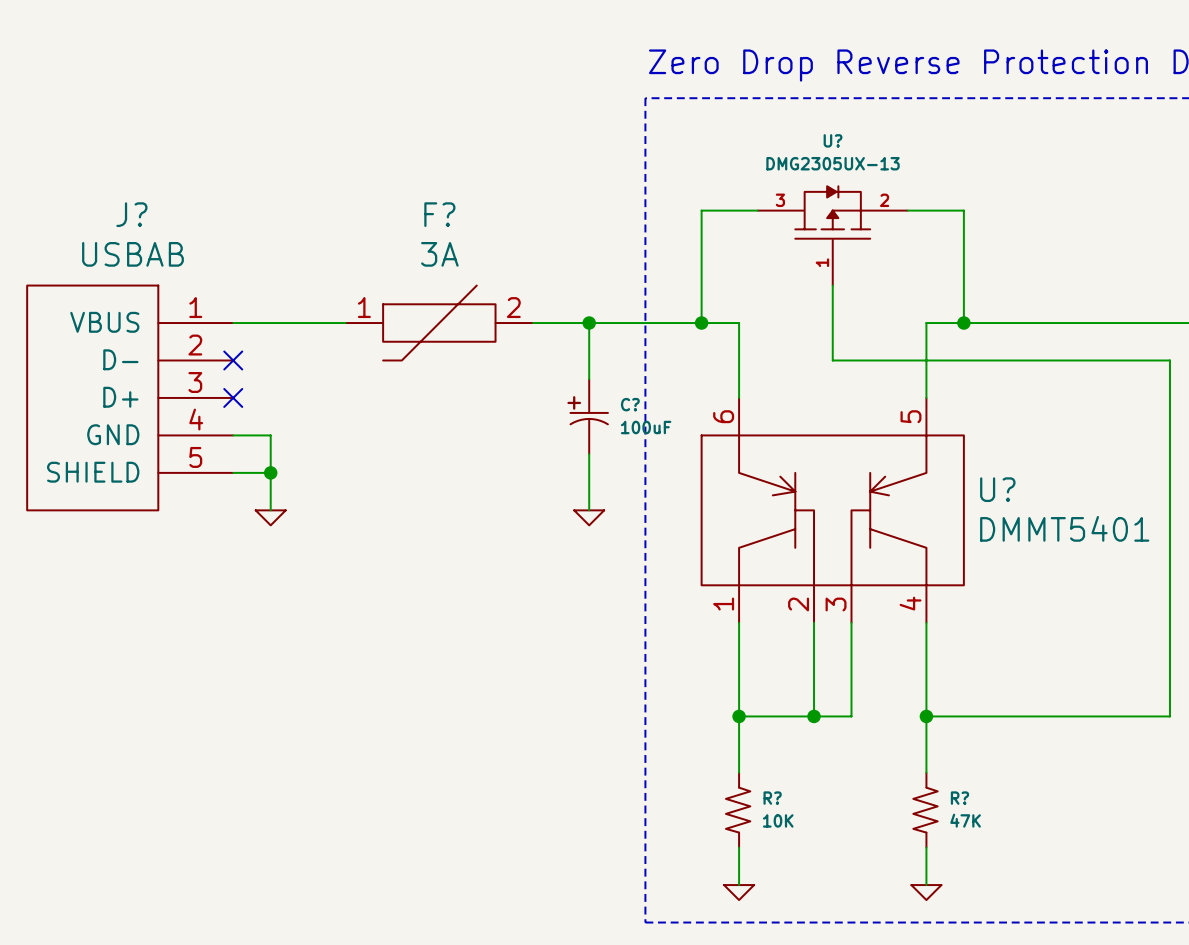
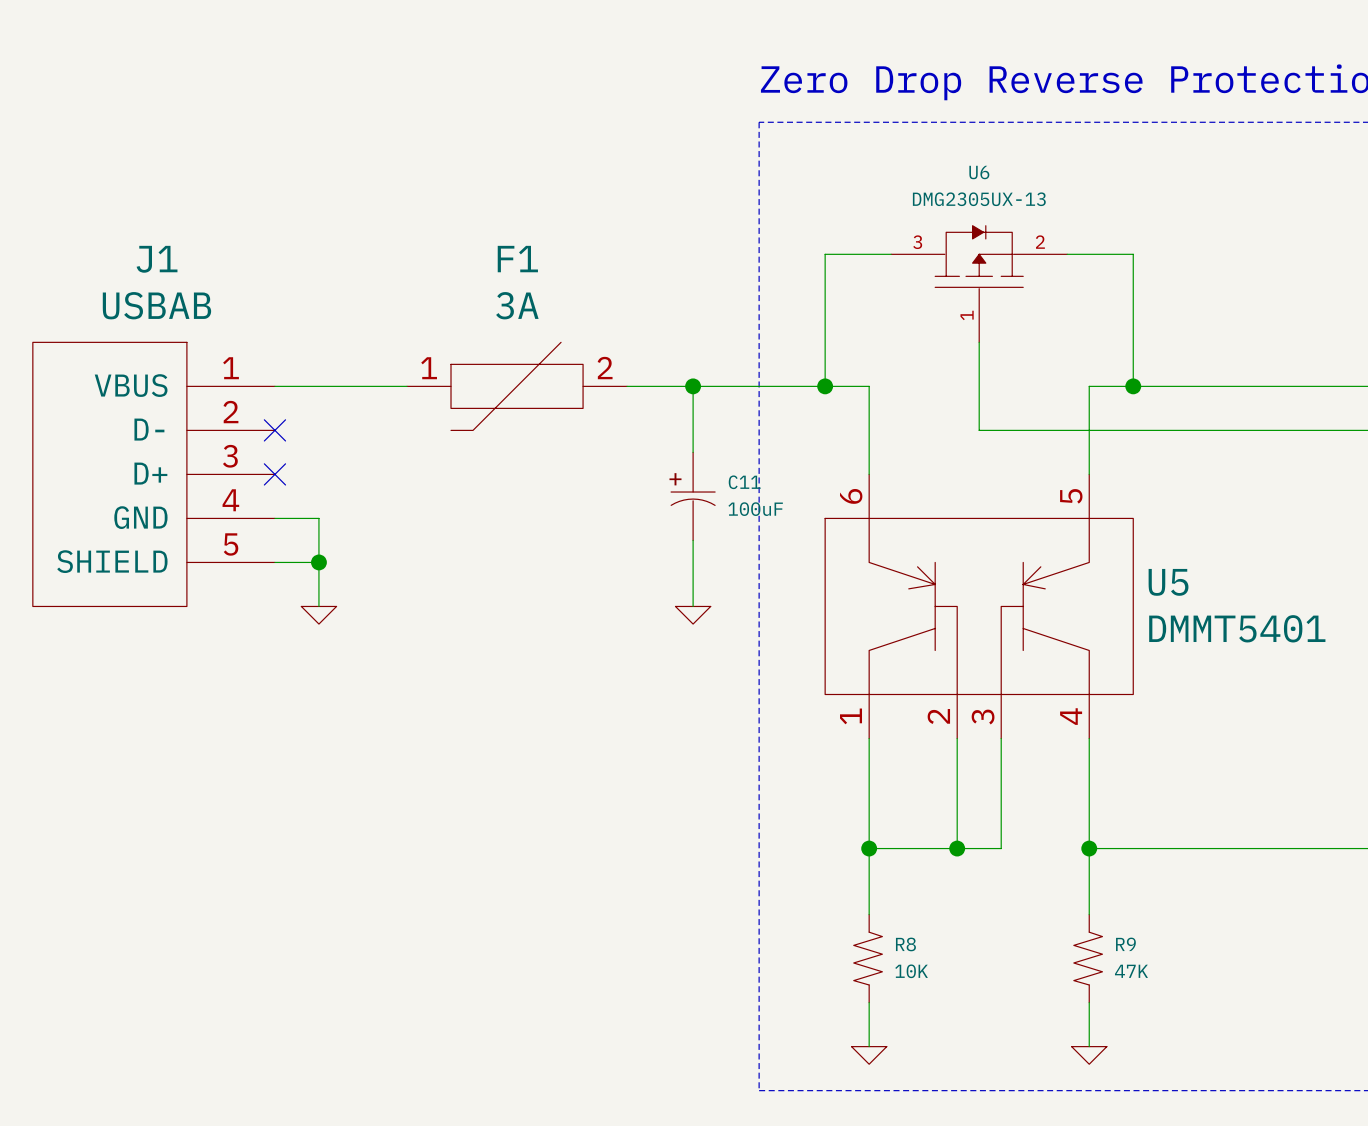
U? name: U? (833, 140) -> U6 (979, 172)
J? name: J? (131, 214) -> J1 (157, 259)
F? name: F? (439, 214) -> F1 (517, 259)
C? name: C? (630, 404) -> C11 (744, 482)
U? name: U? (997, 489) -> U5 (1168, 582)
R? name: R? (772, 798) -> R8 (905, 944)
R? name: R? (959, 798) -> R9 (1125, 944)

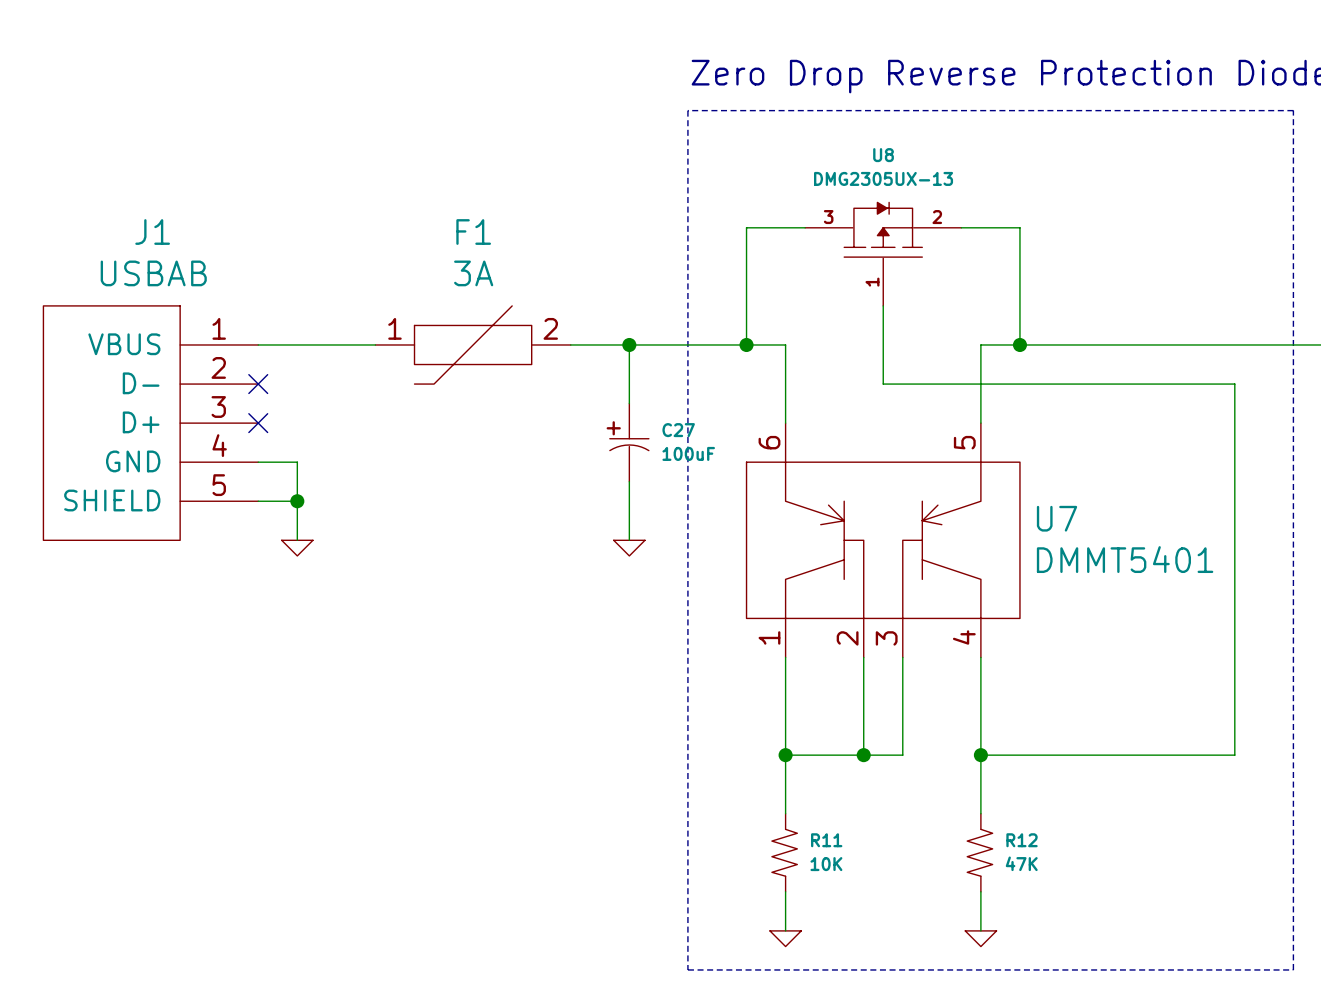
U6 name: U6 (979, 172) -> U8 (883, 155)
C11 name: C11 (744, 482) -> C27 (678, 430)
U5 name: U5 (1168, 582) -> U7 (1057, 518)
R8 name: R8 (905, 944) -> R11 (826, 840)
R9 name: R9 (1125, 944) -> R12 (1022, 840)

